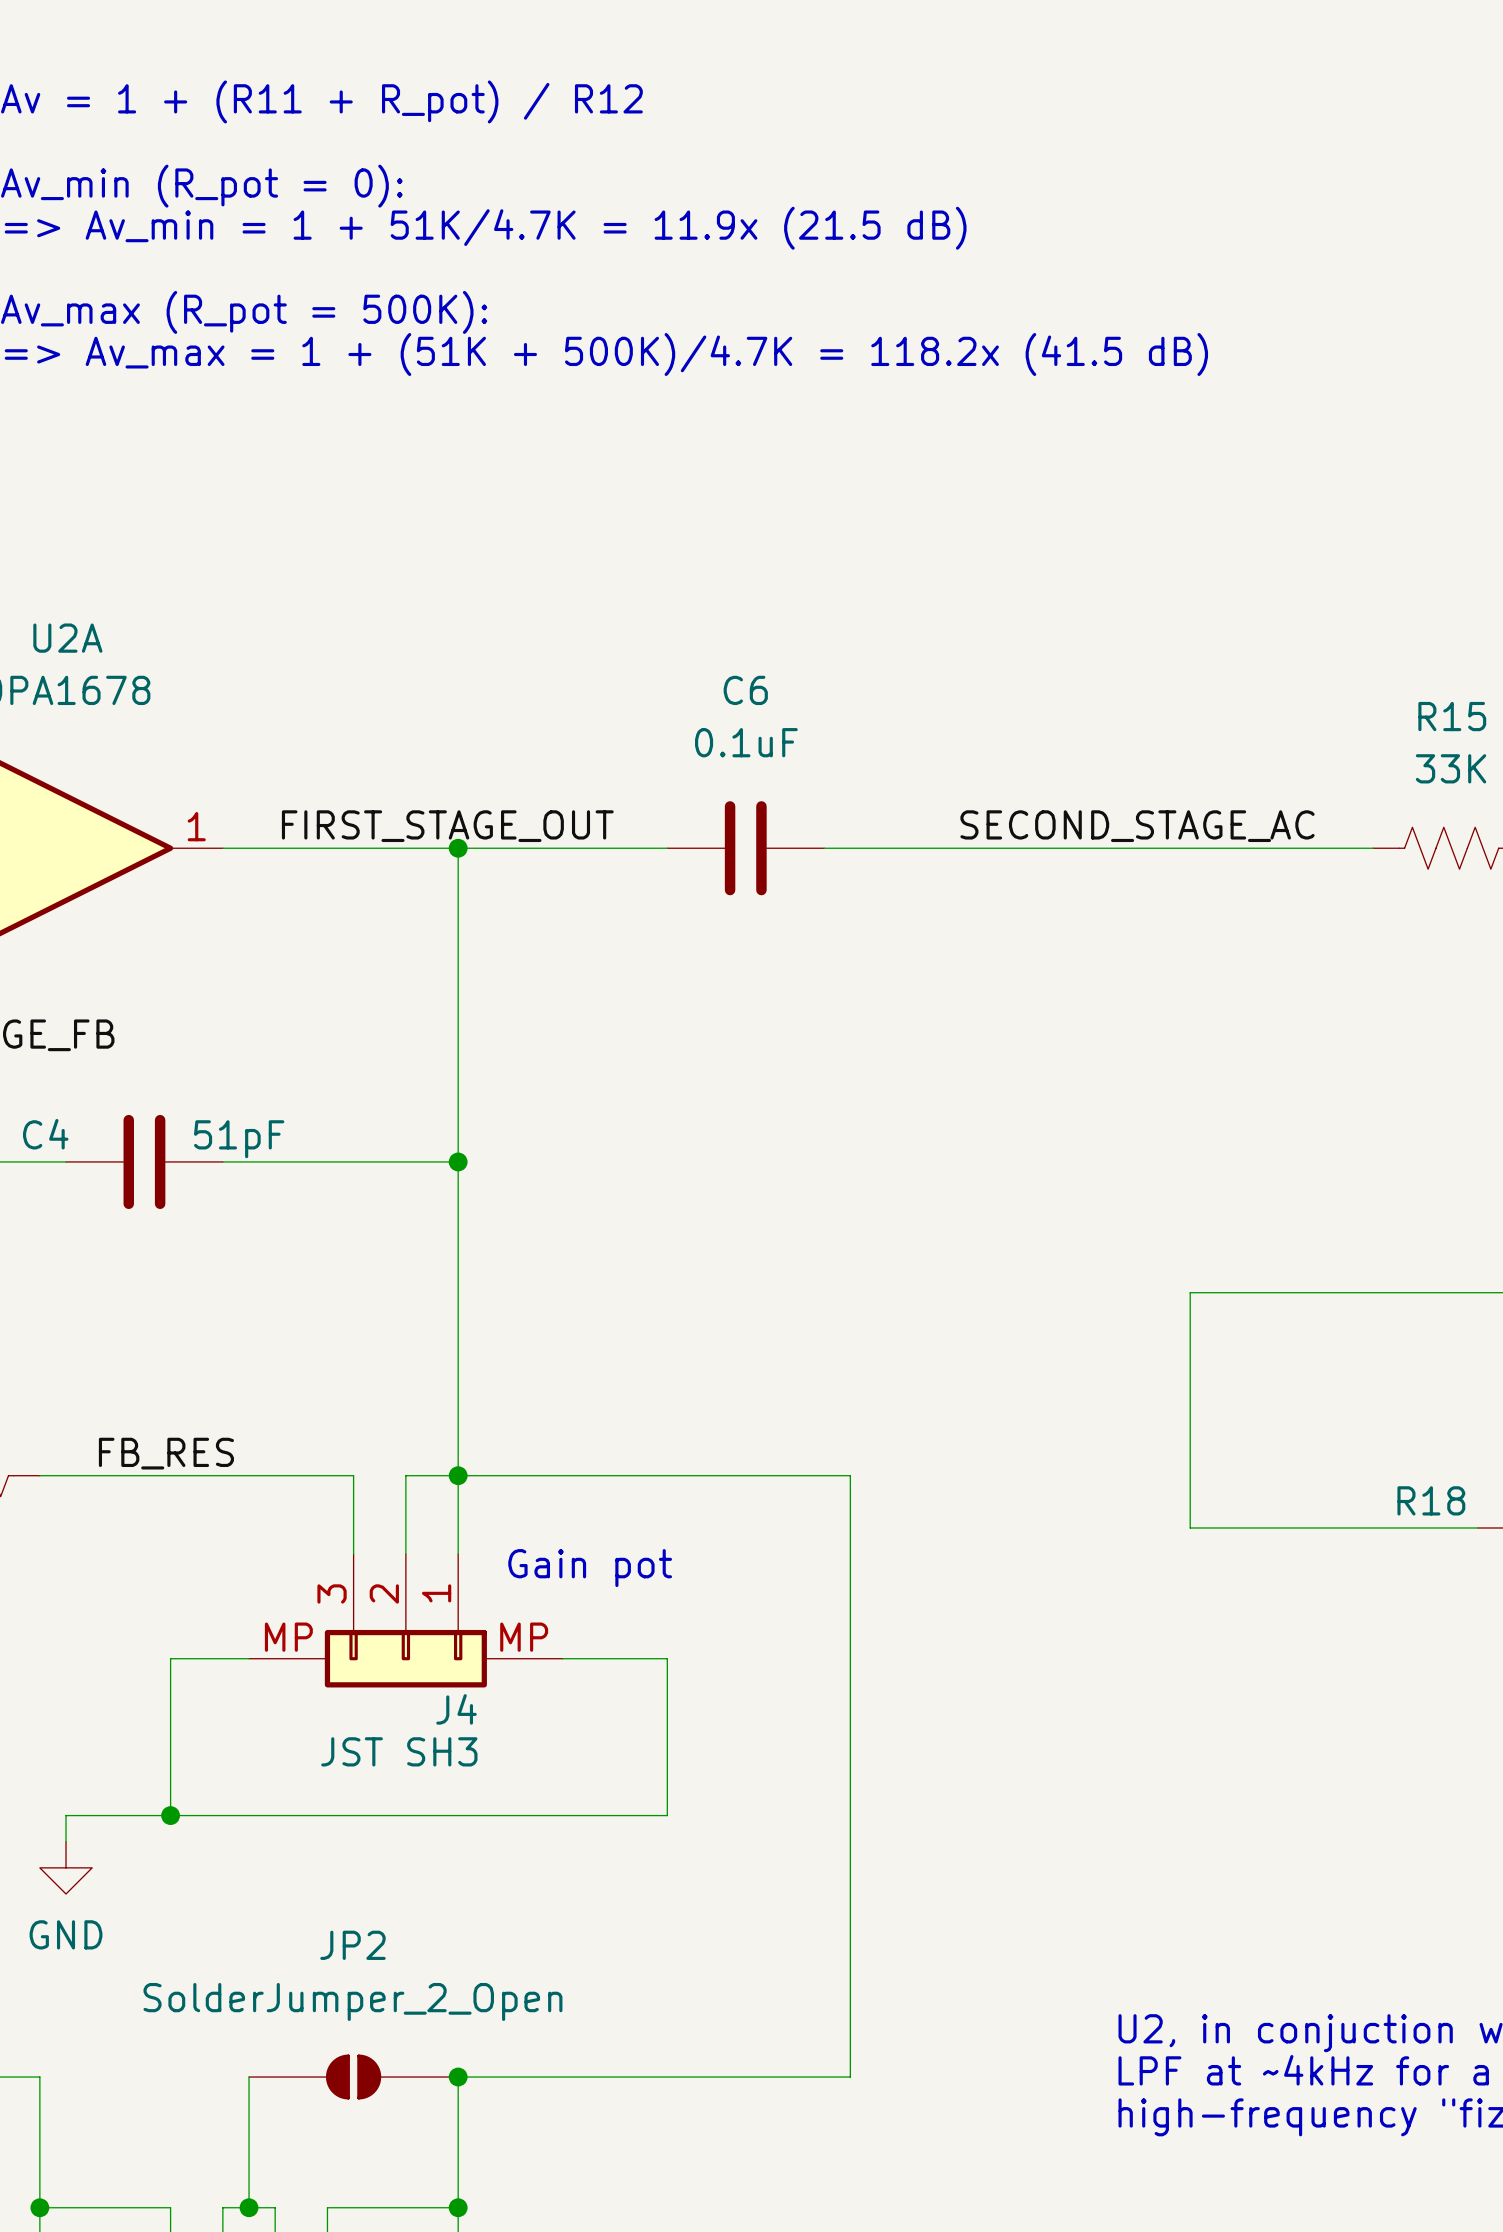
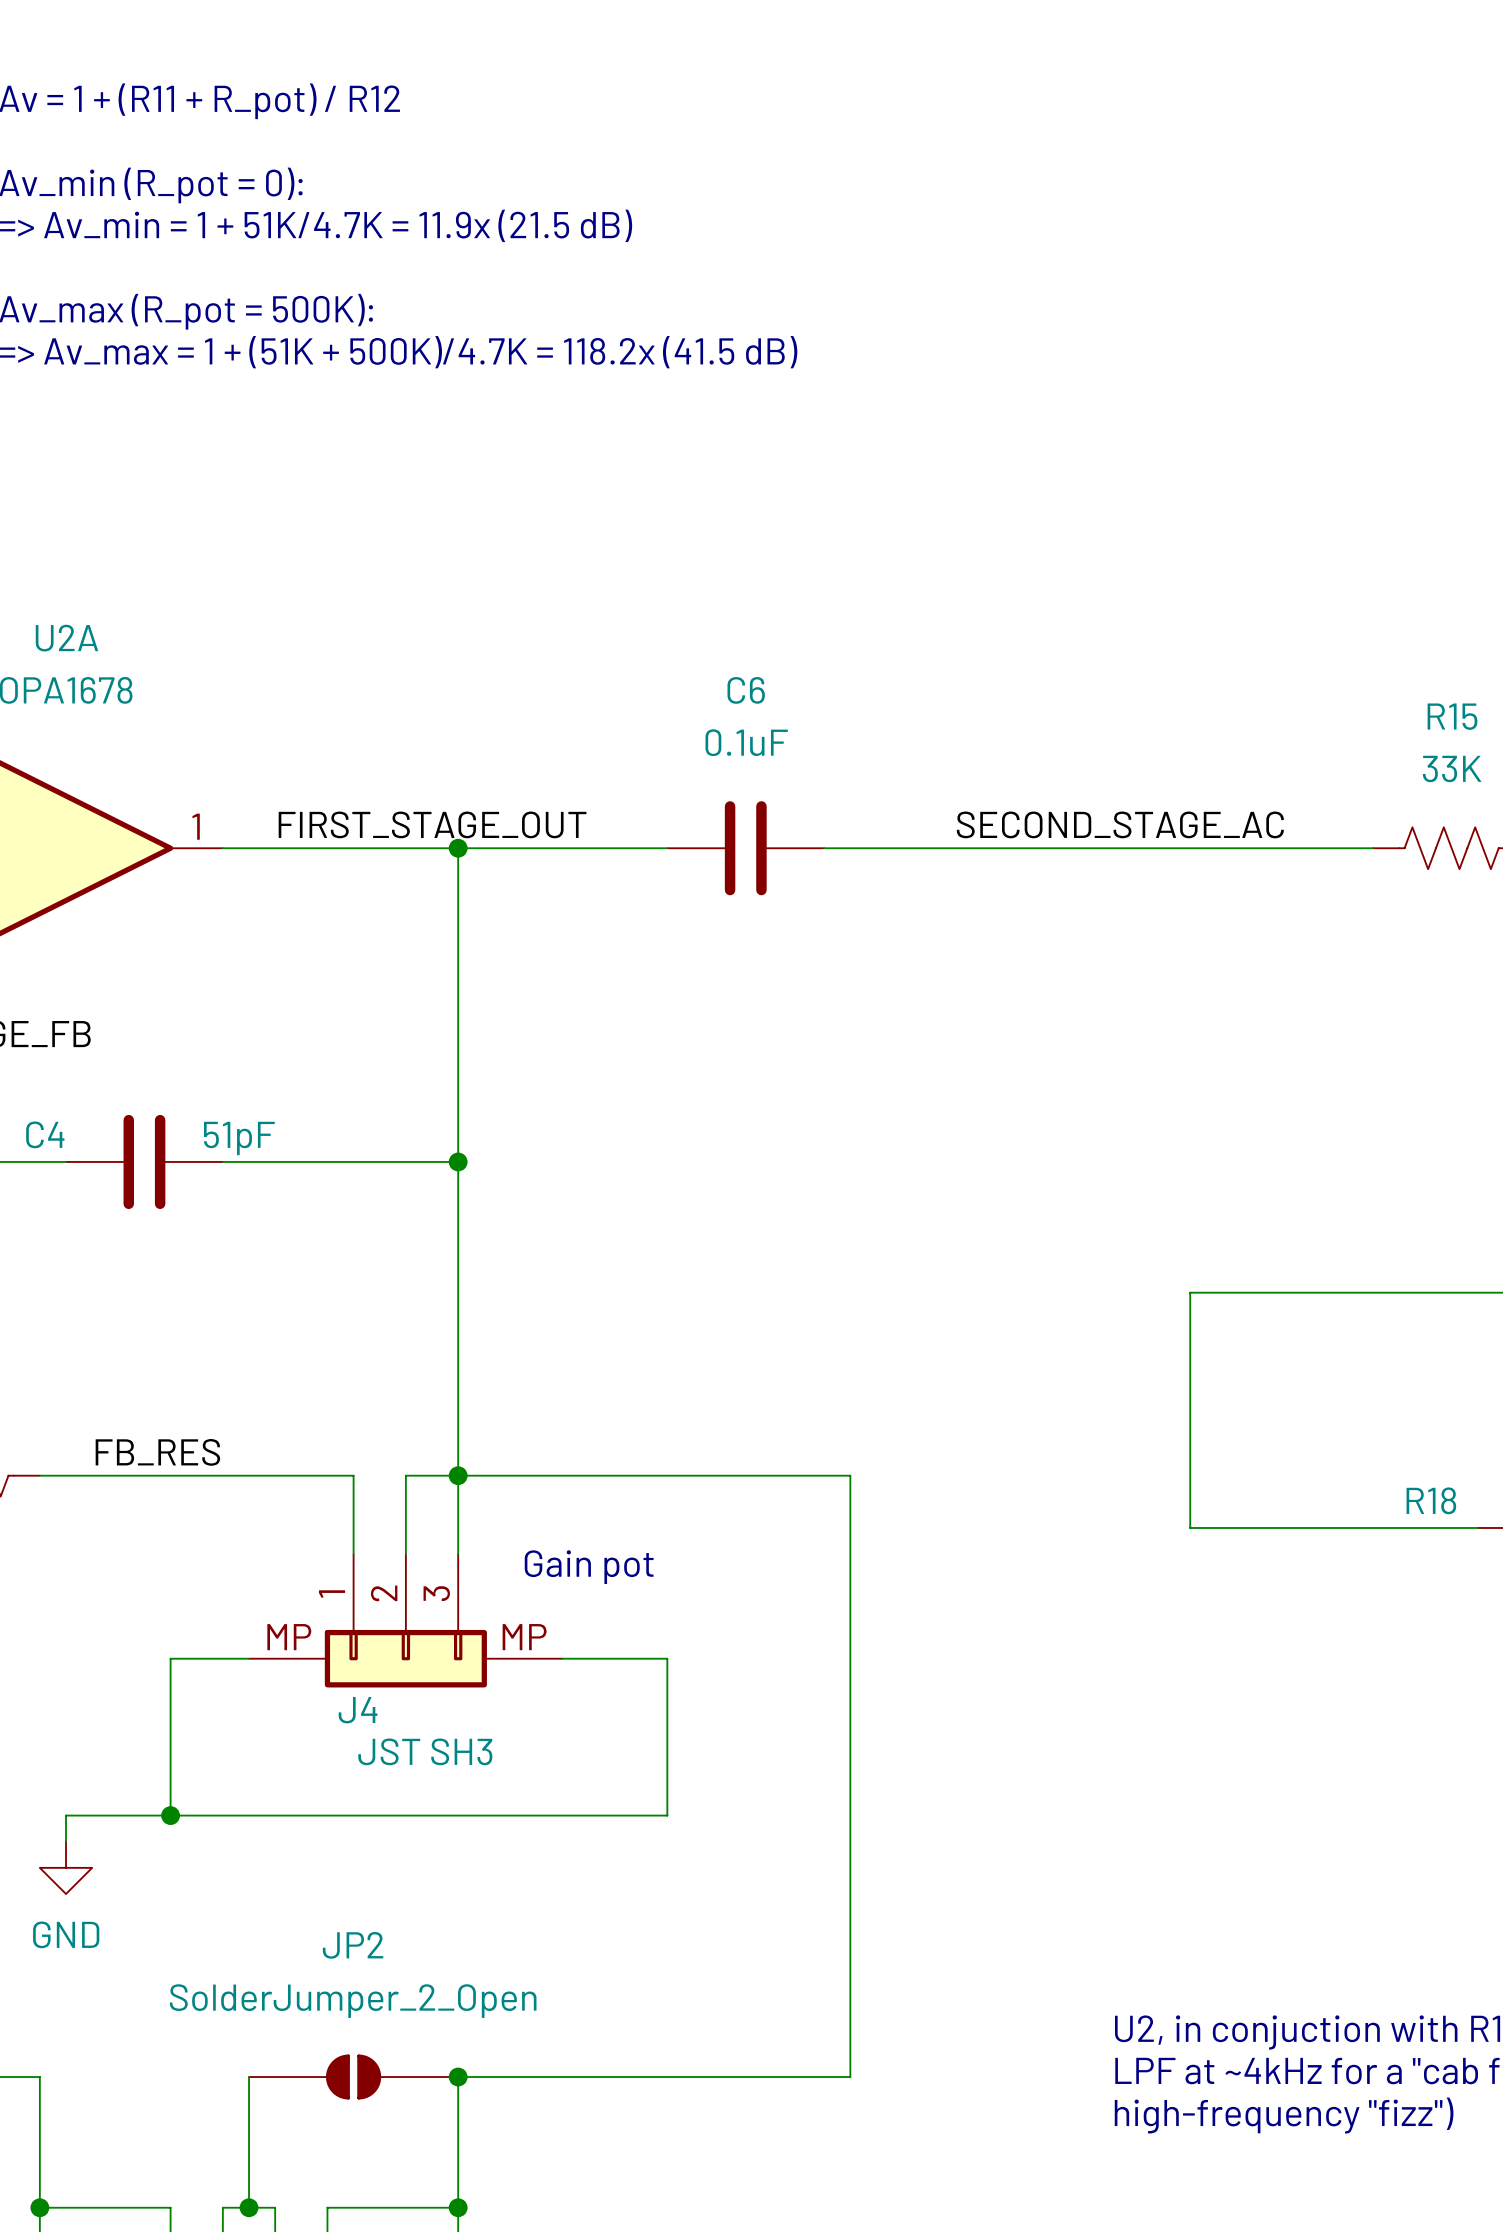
J4 flip: as is (405, 1658) -> left-right (405, 1658)

